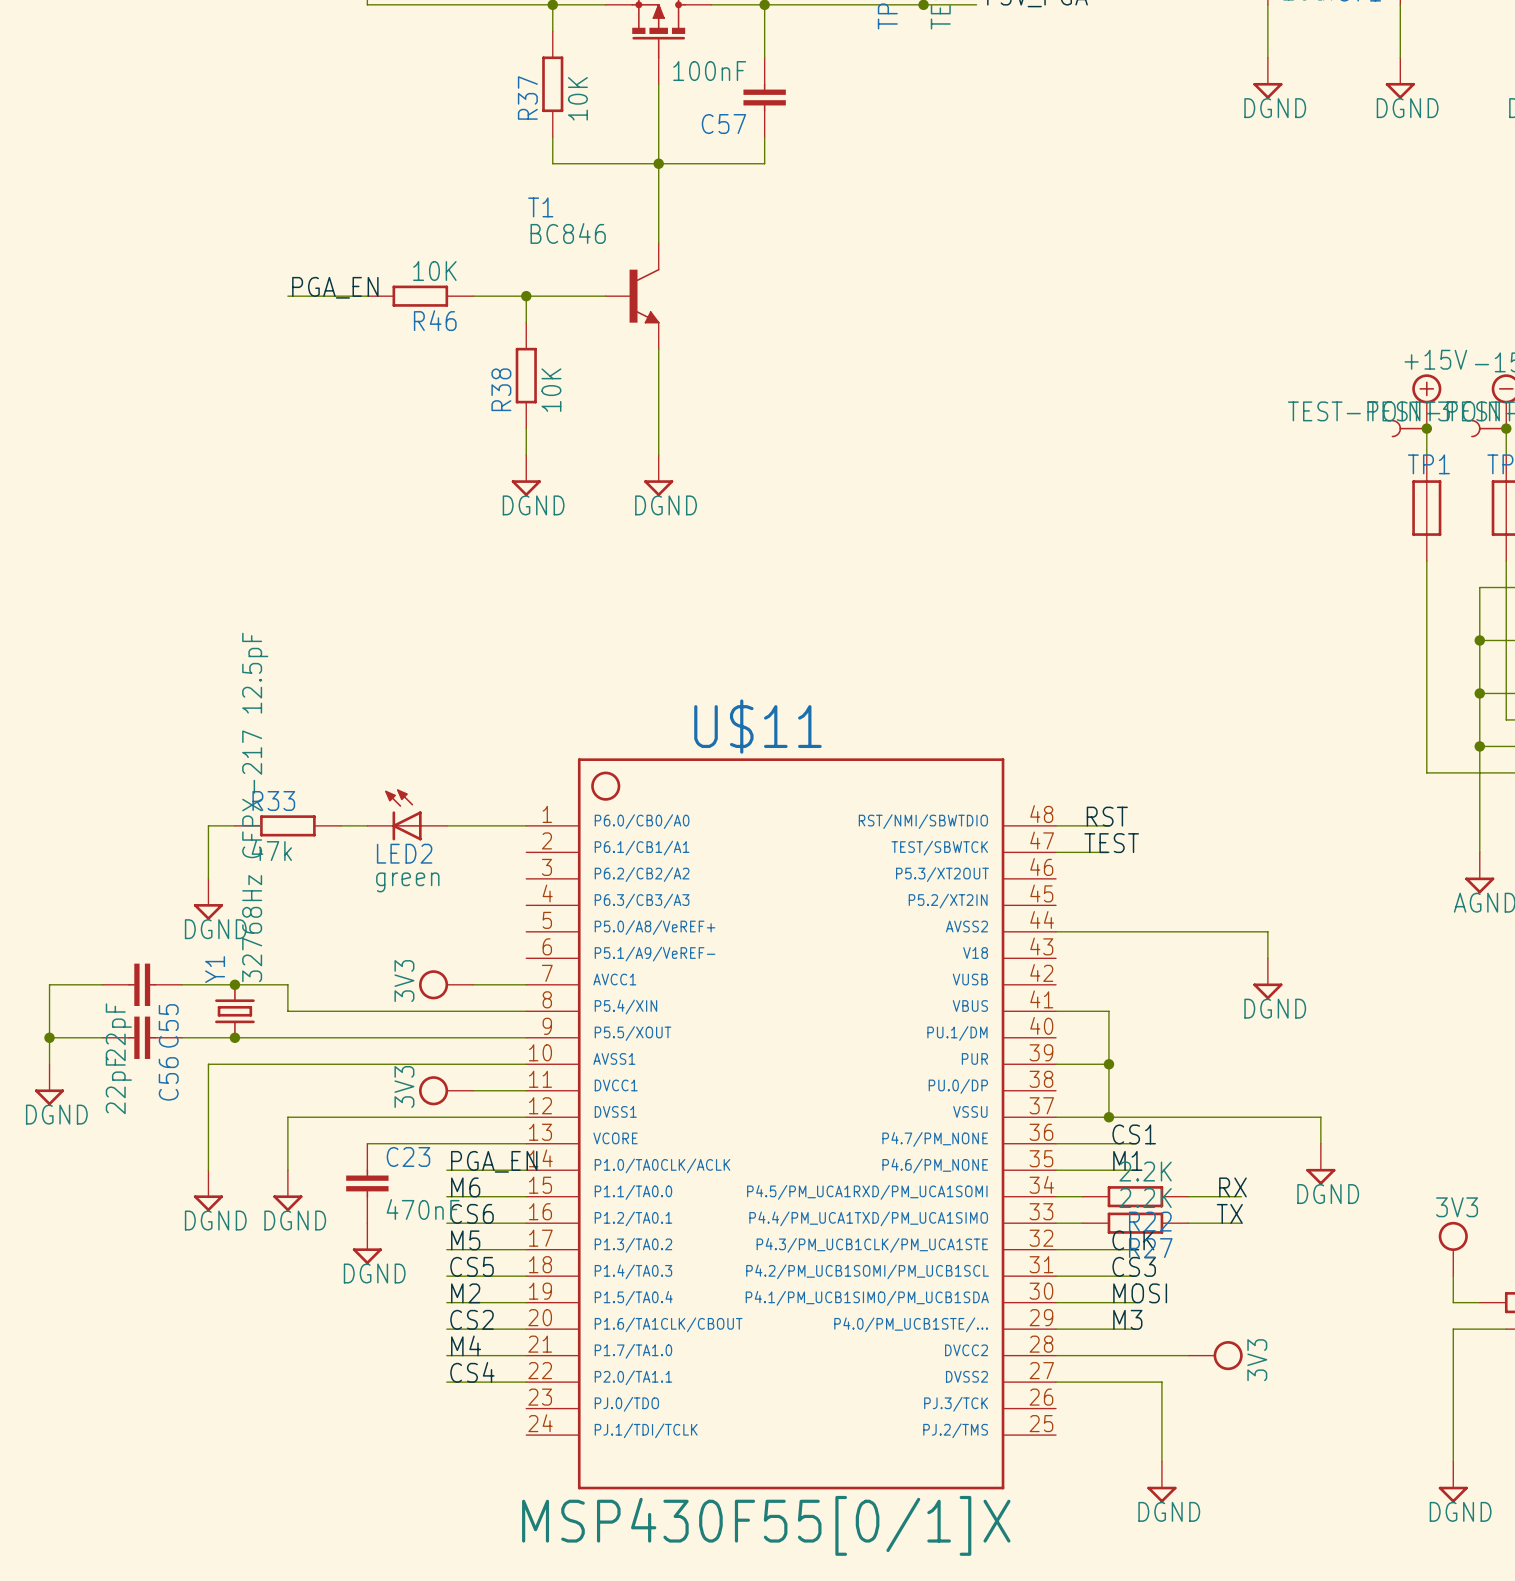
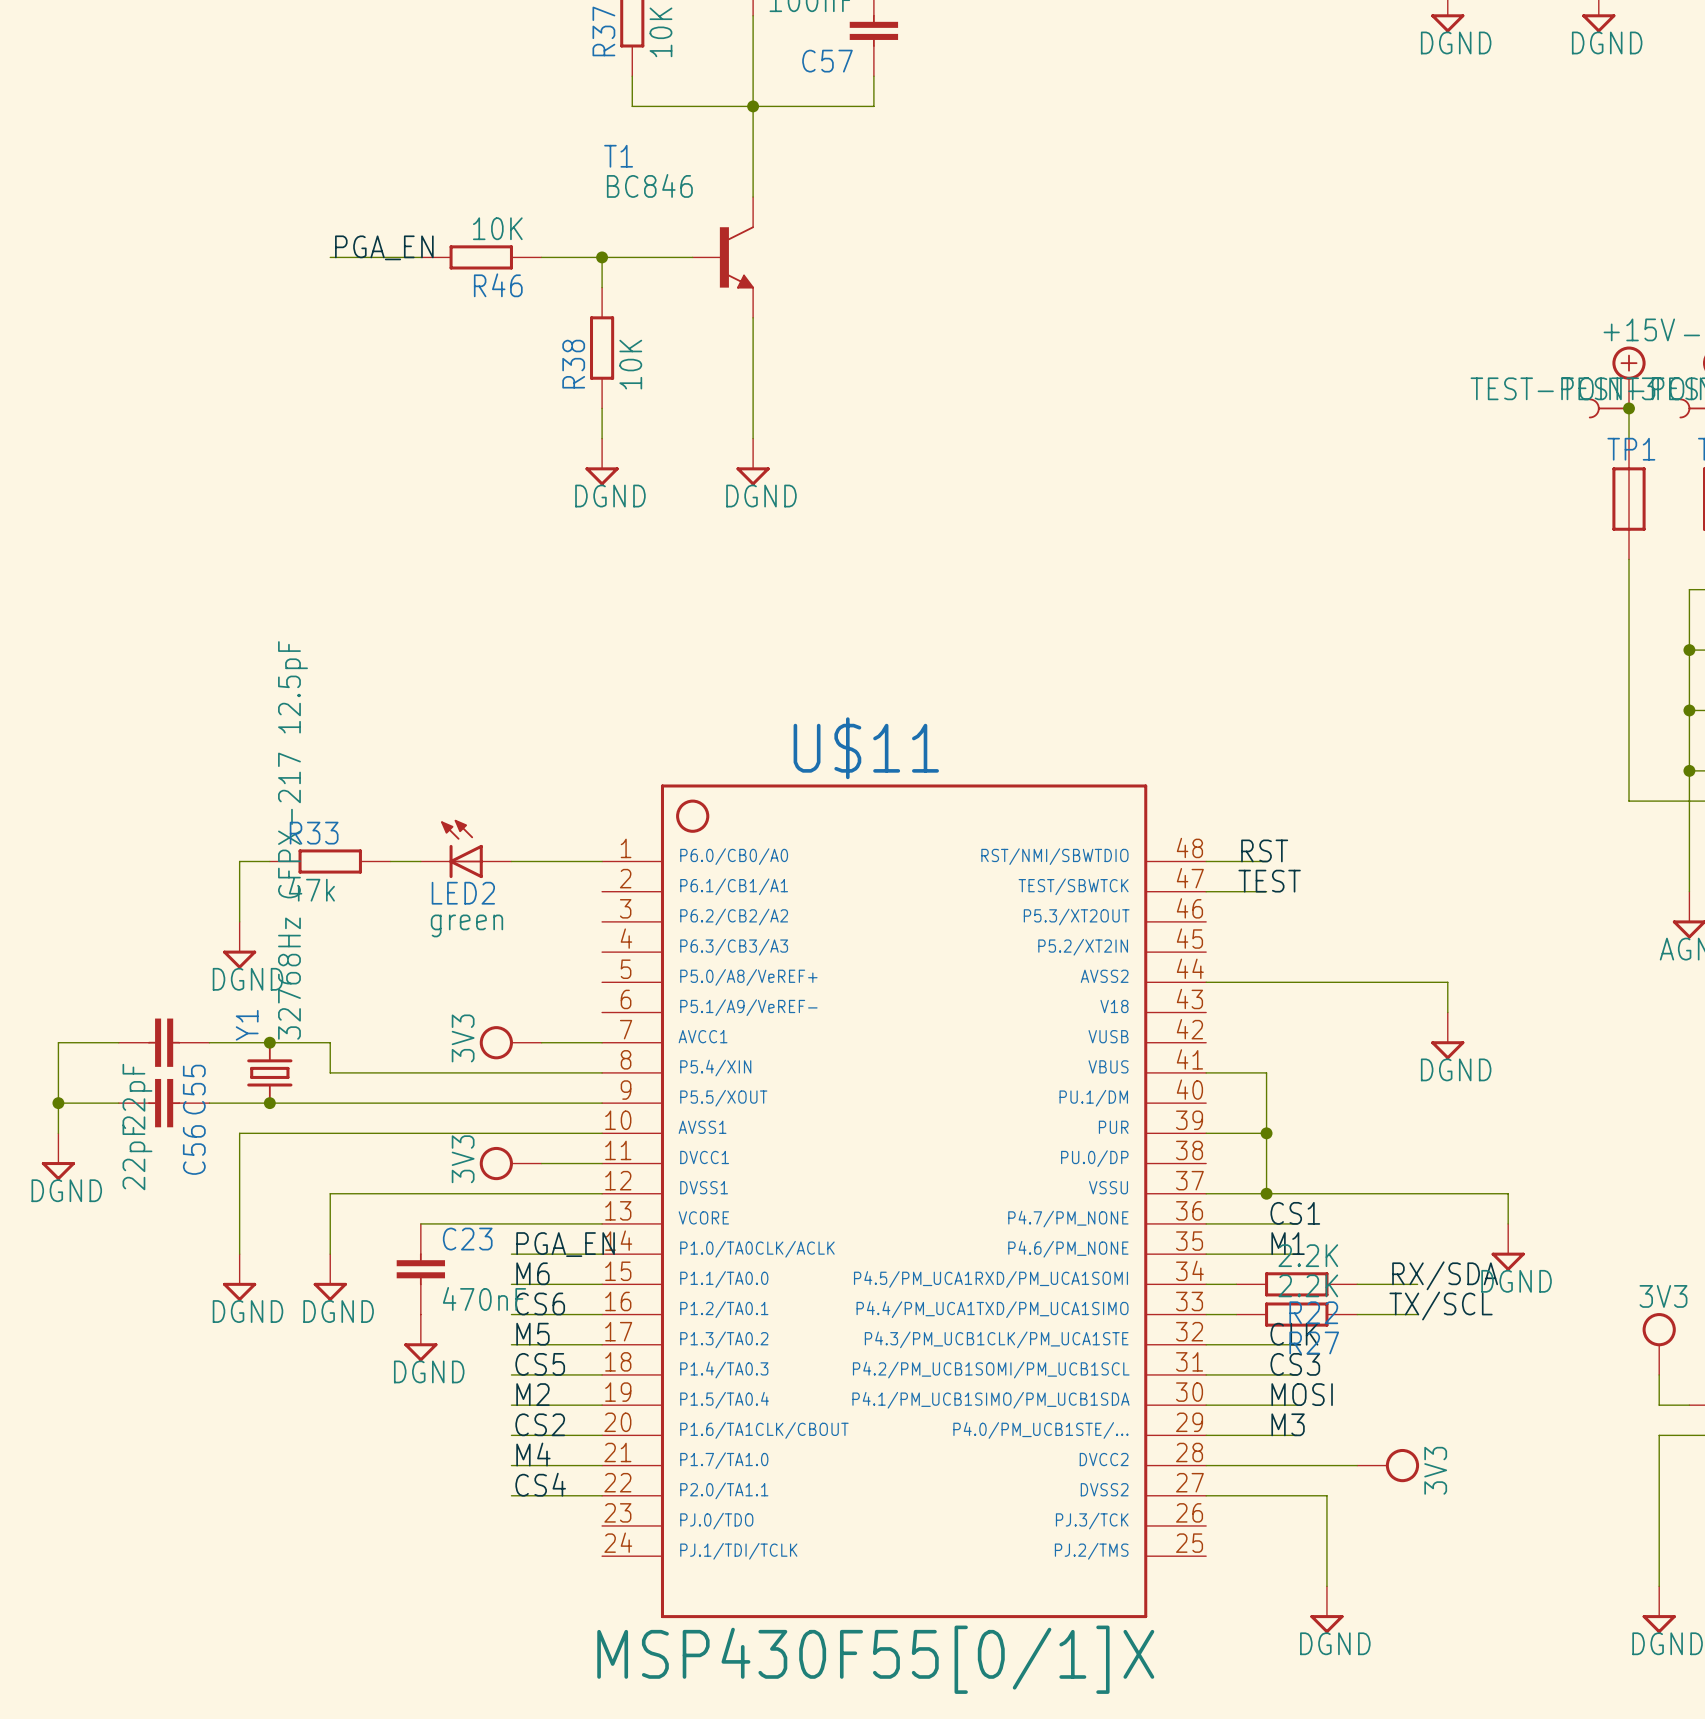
label: RX (1232, 1187) -> RX/SDA (1445, 1275)
label: TX (1229, 1213) -> TX/SCL (1441, 1305)

